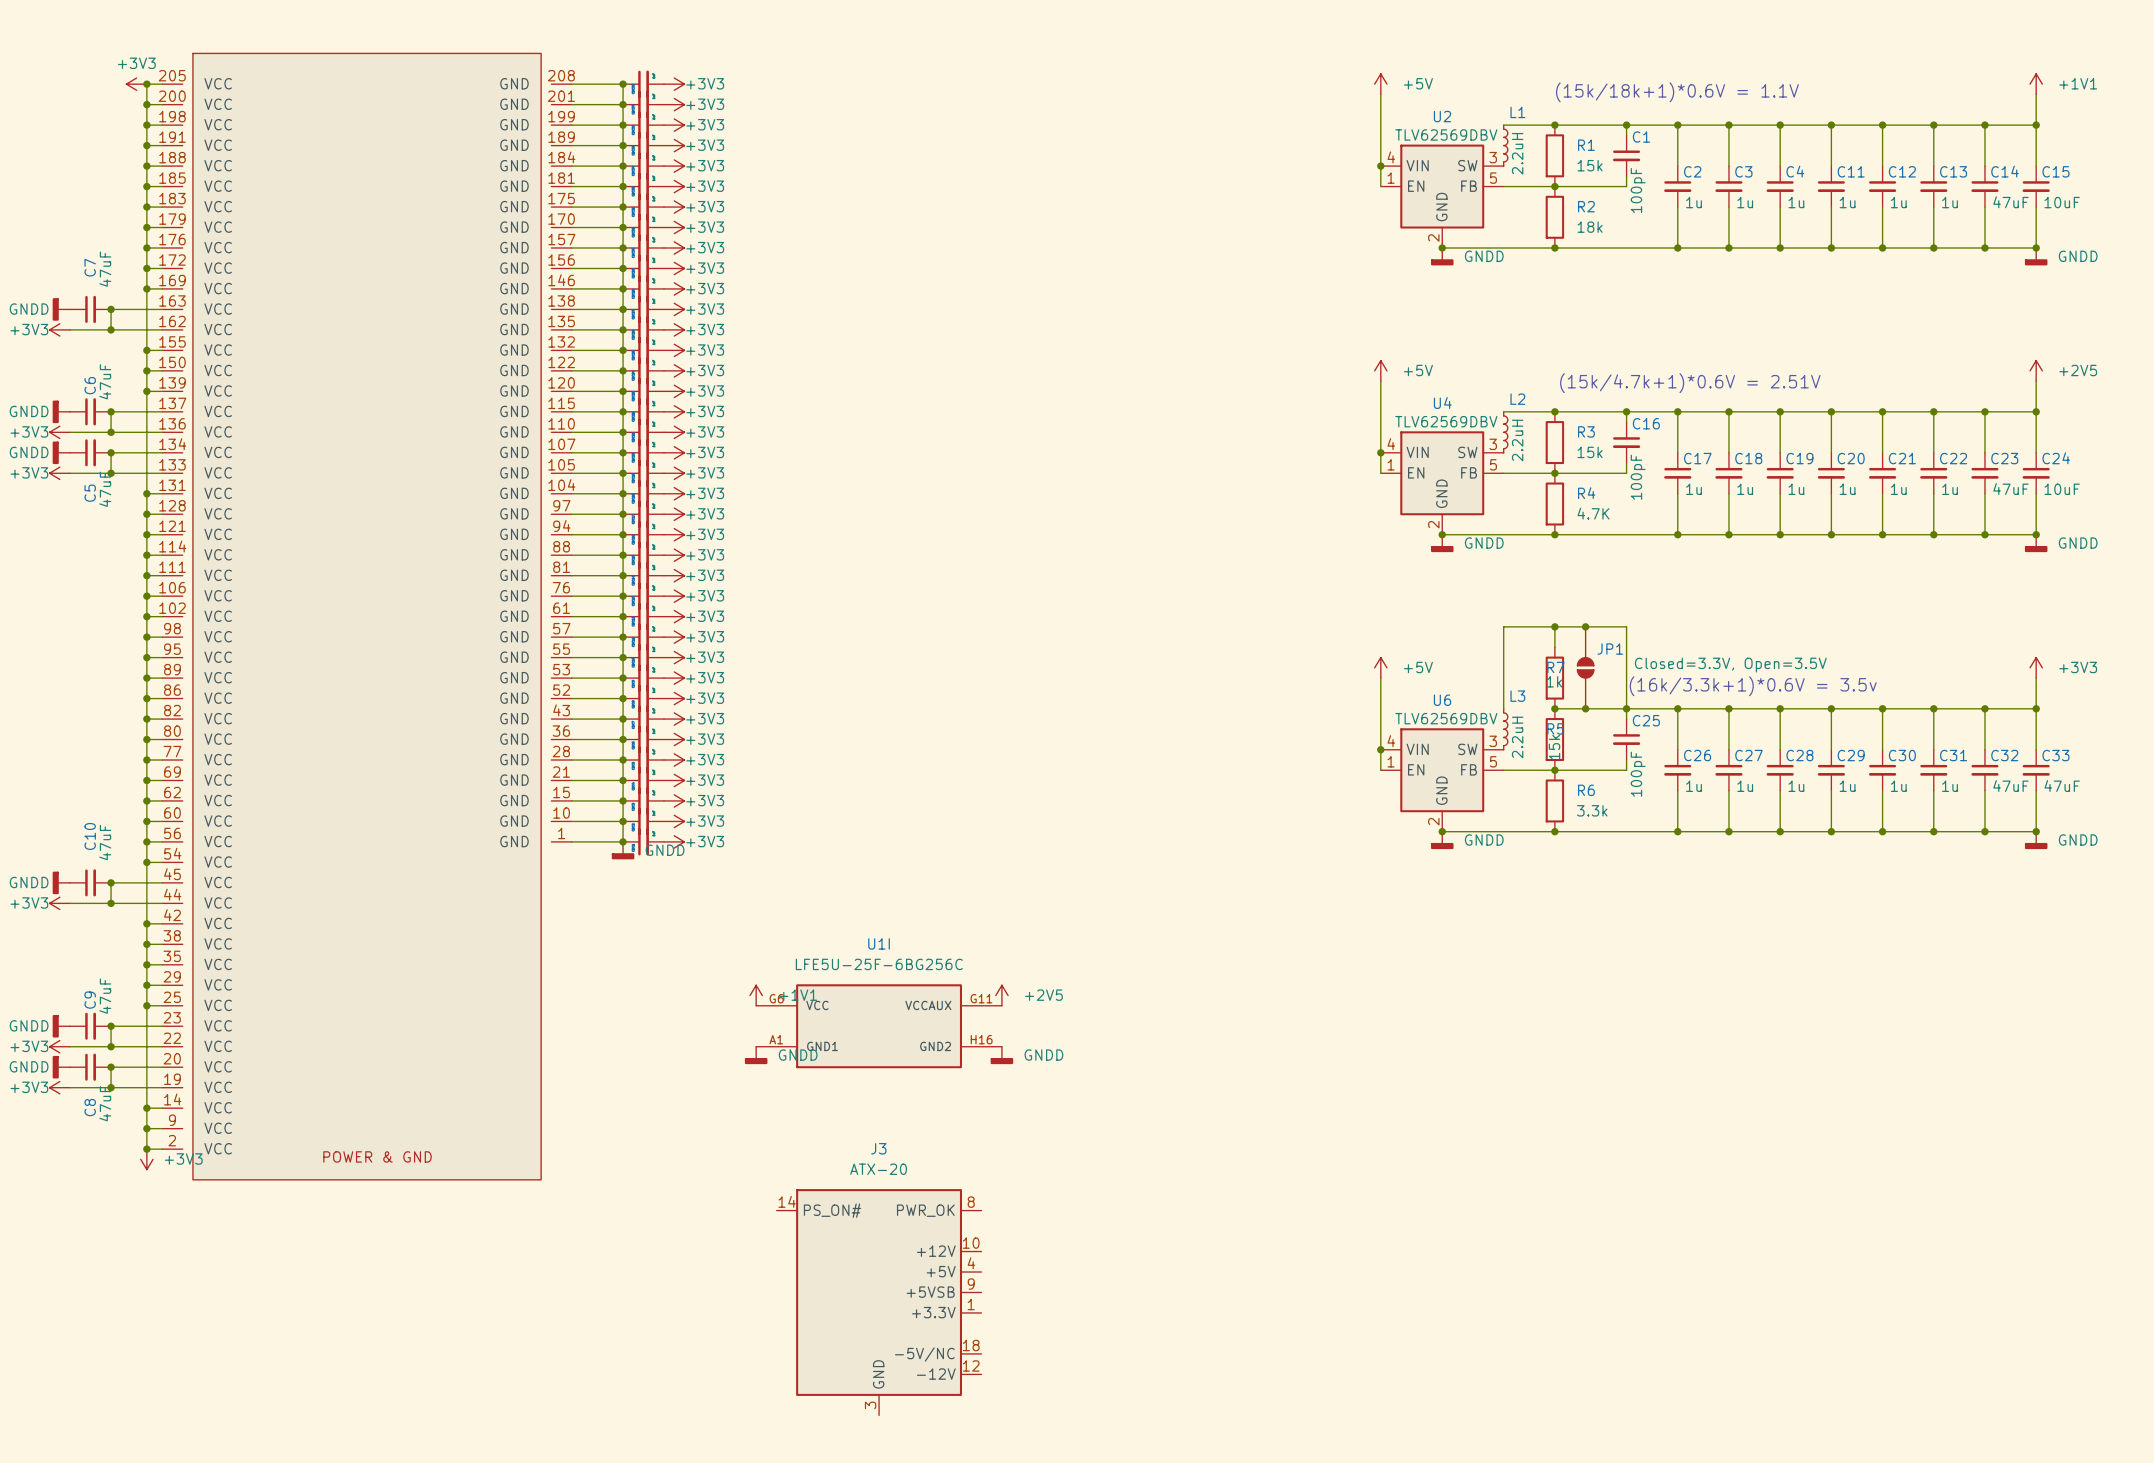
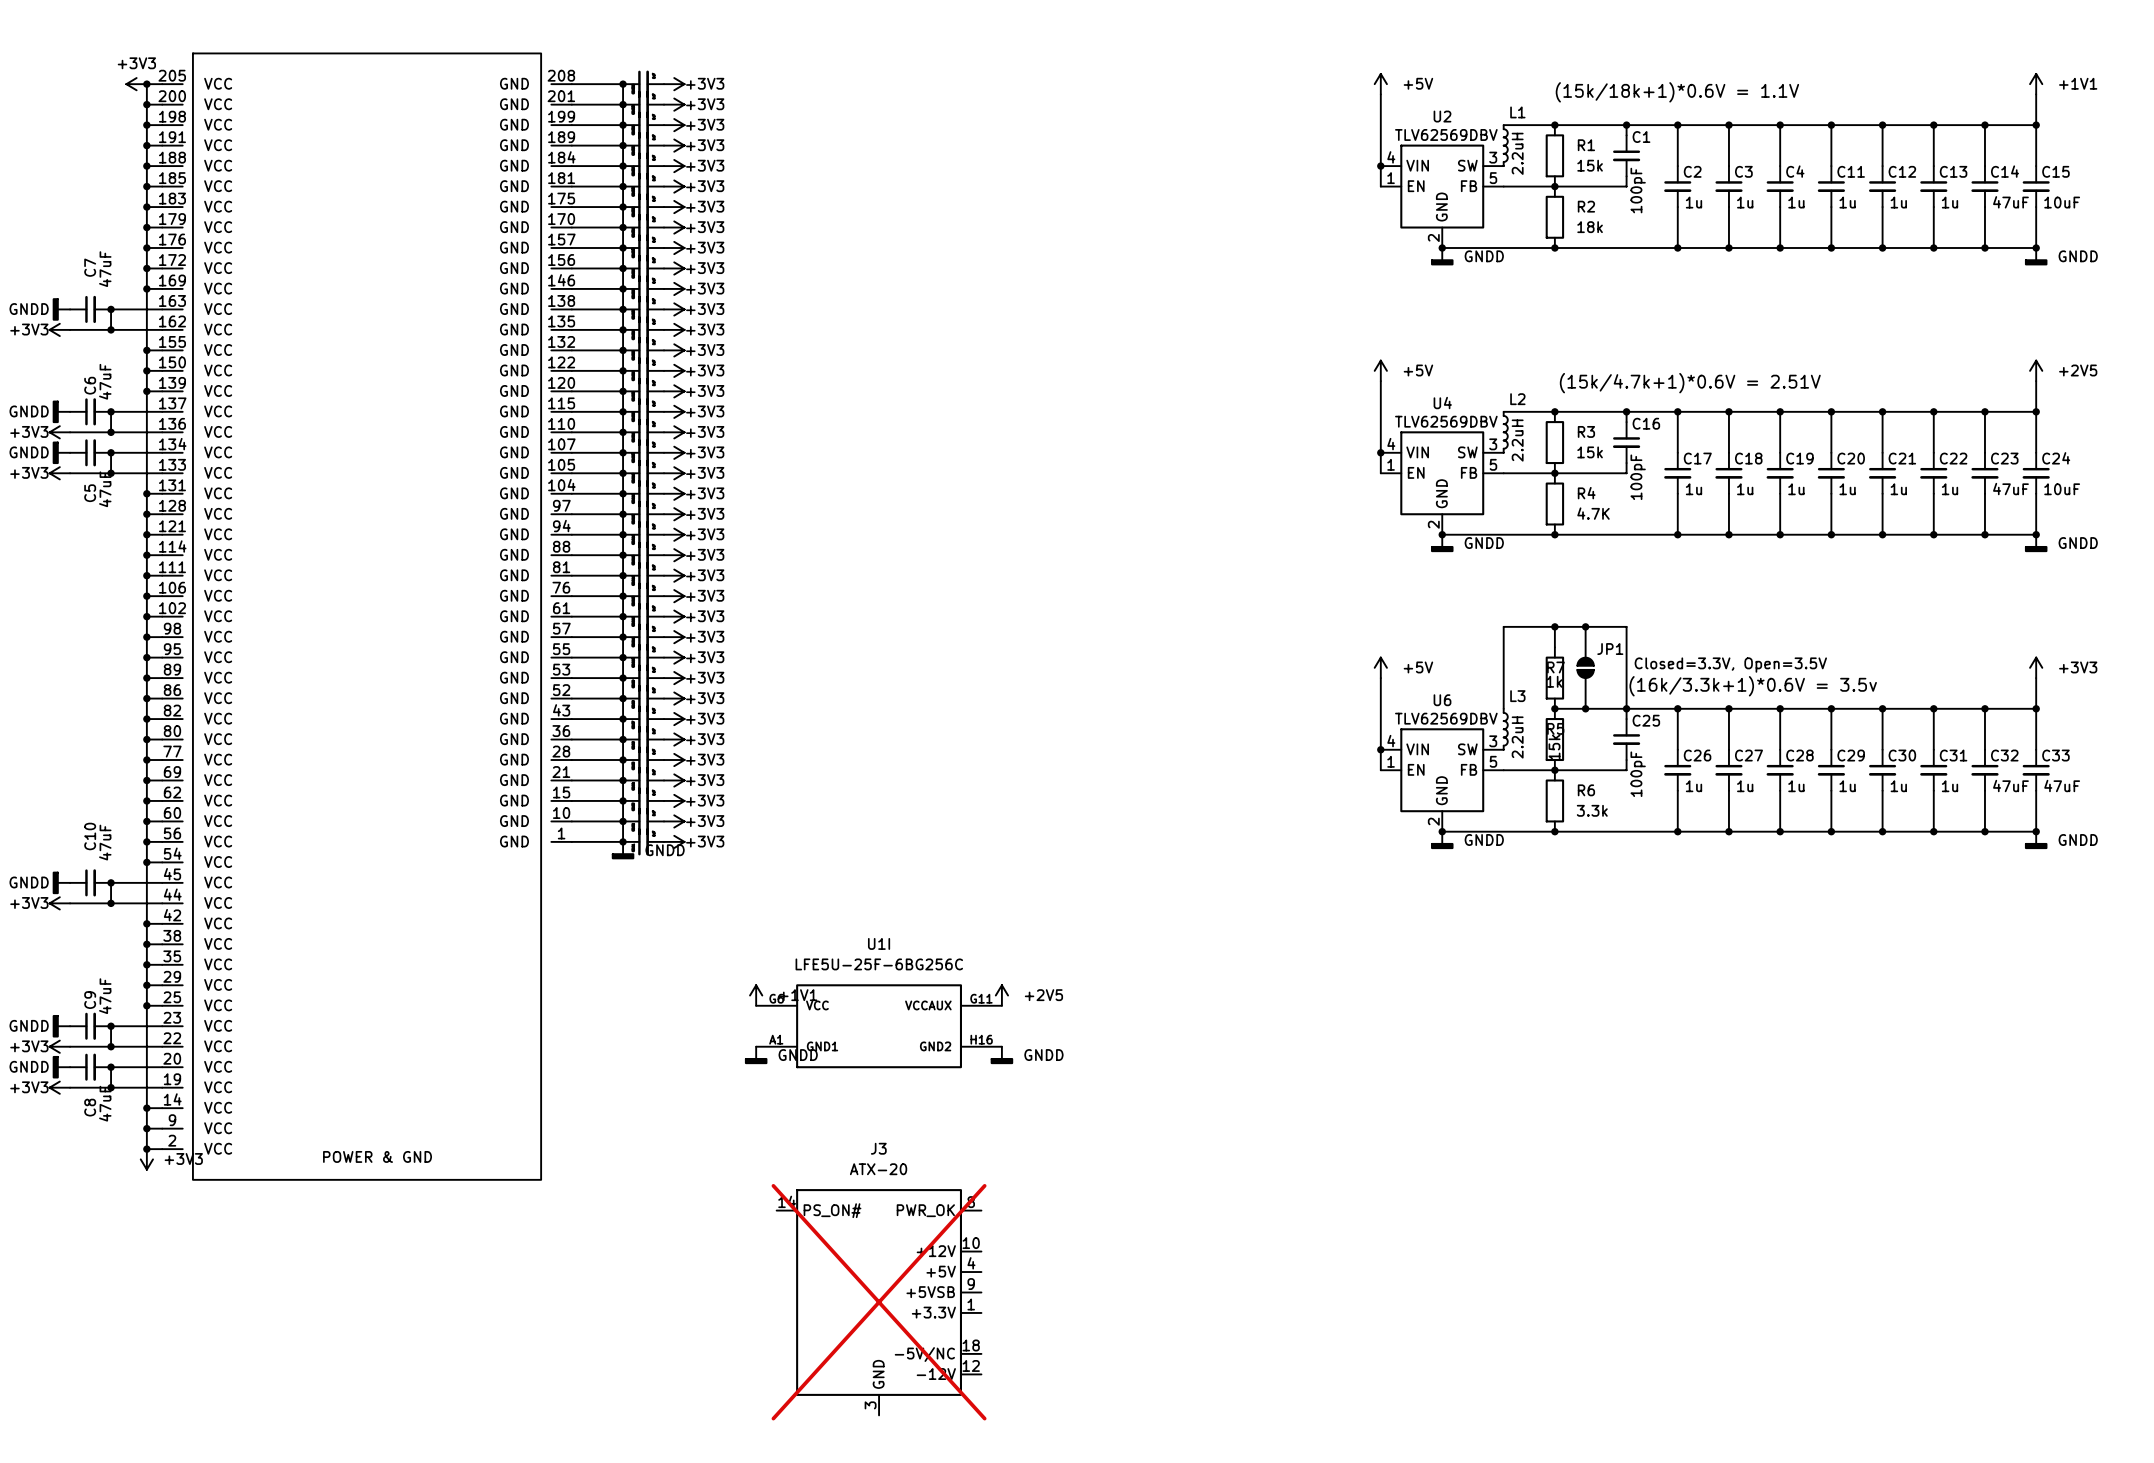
J3 do-not-place cross: none -> (879, 1302)

